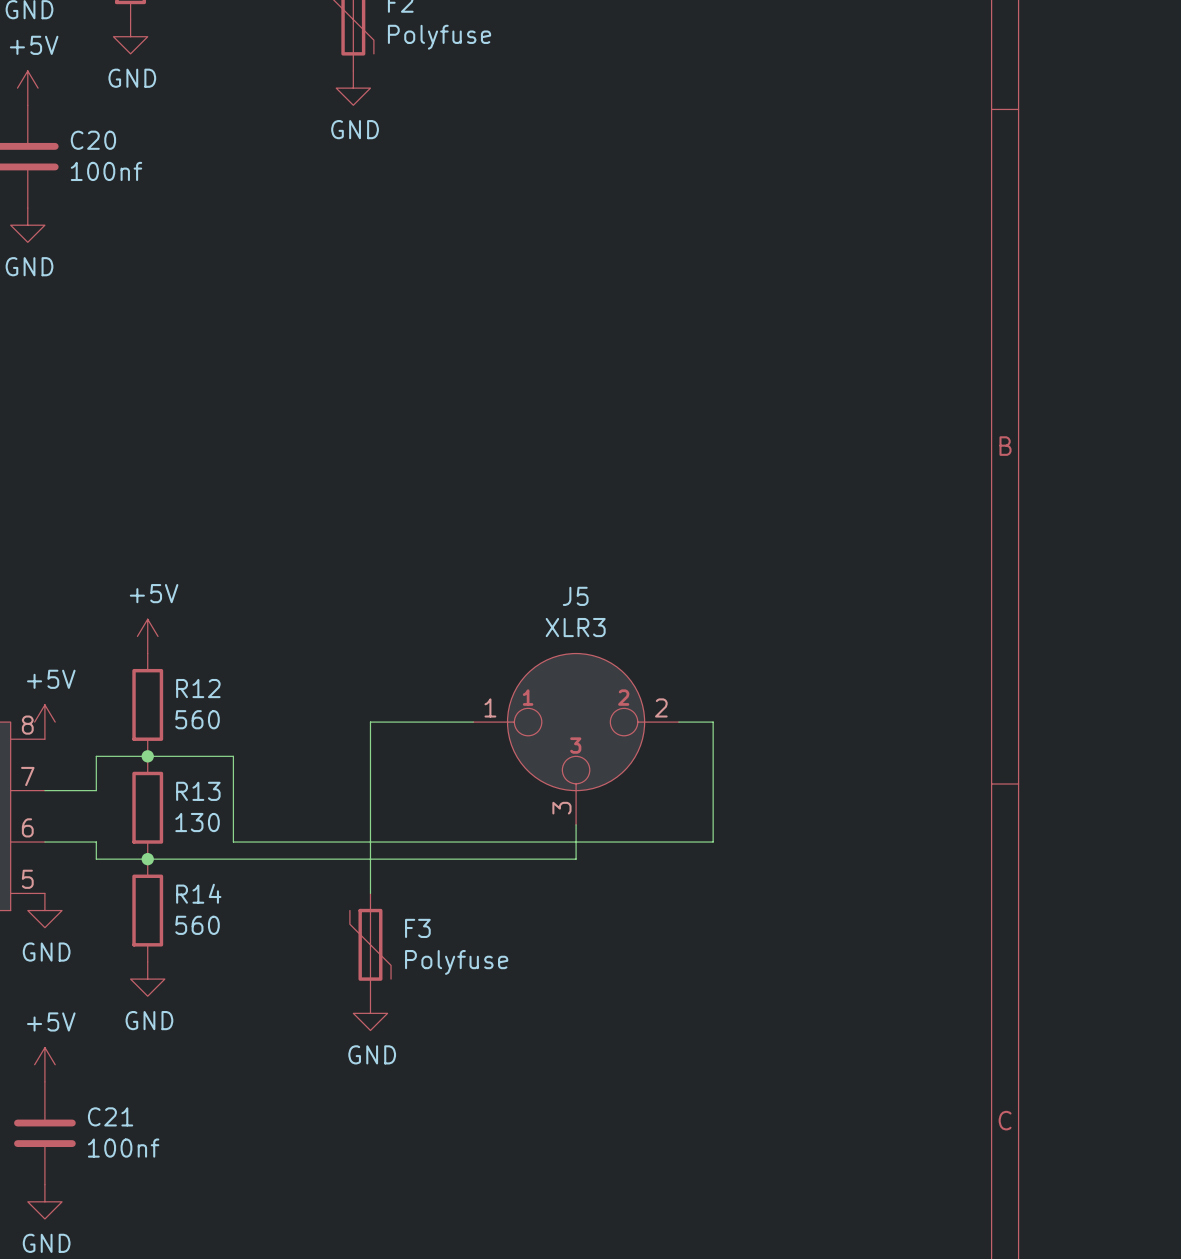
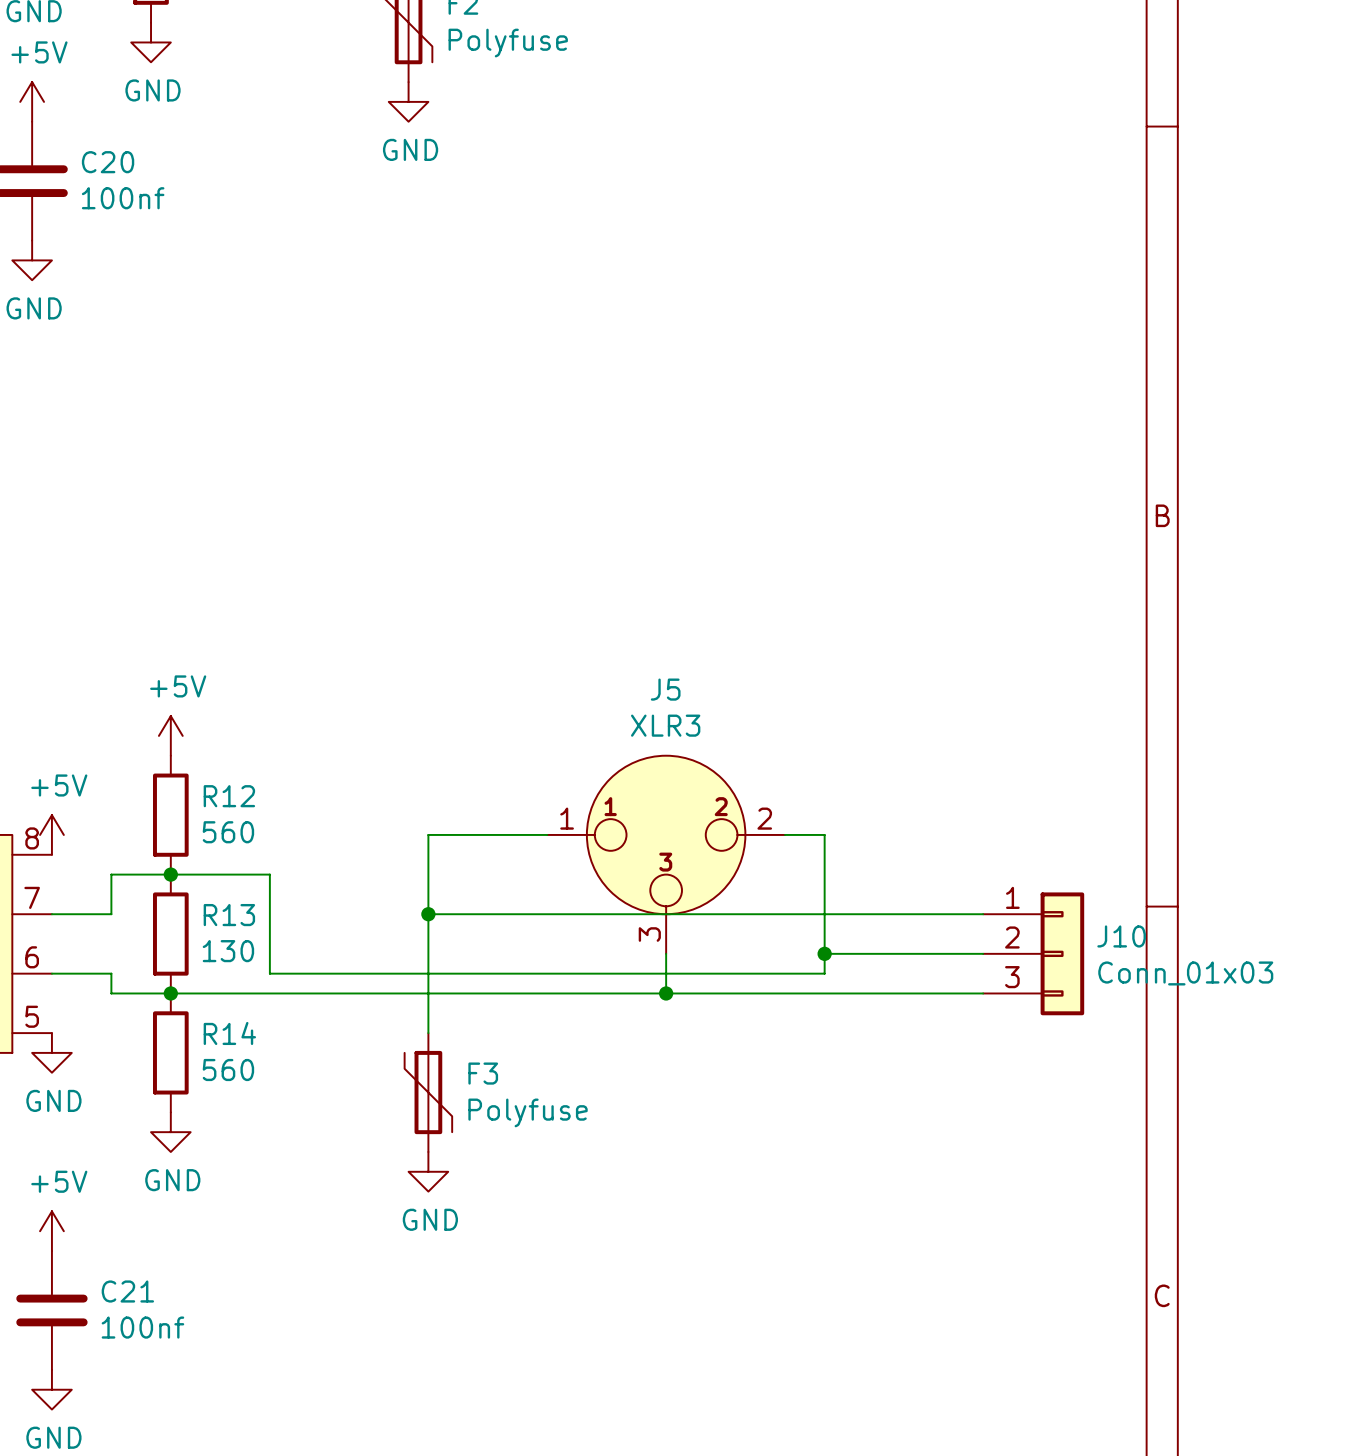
wire: none -> (428, 914) (983, 914)
junction: none -> (428, 914)
wire: none -> (824, 953) (983, 953)
junction: none -> (824, 953)
J10: none -> Conn_01x03 (1033, 953)
wire: none -> (666, 993) (983, 993)
junction: none -> (666, 993)

